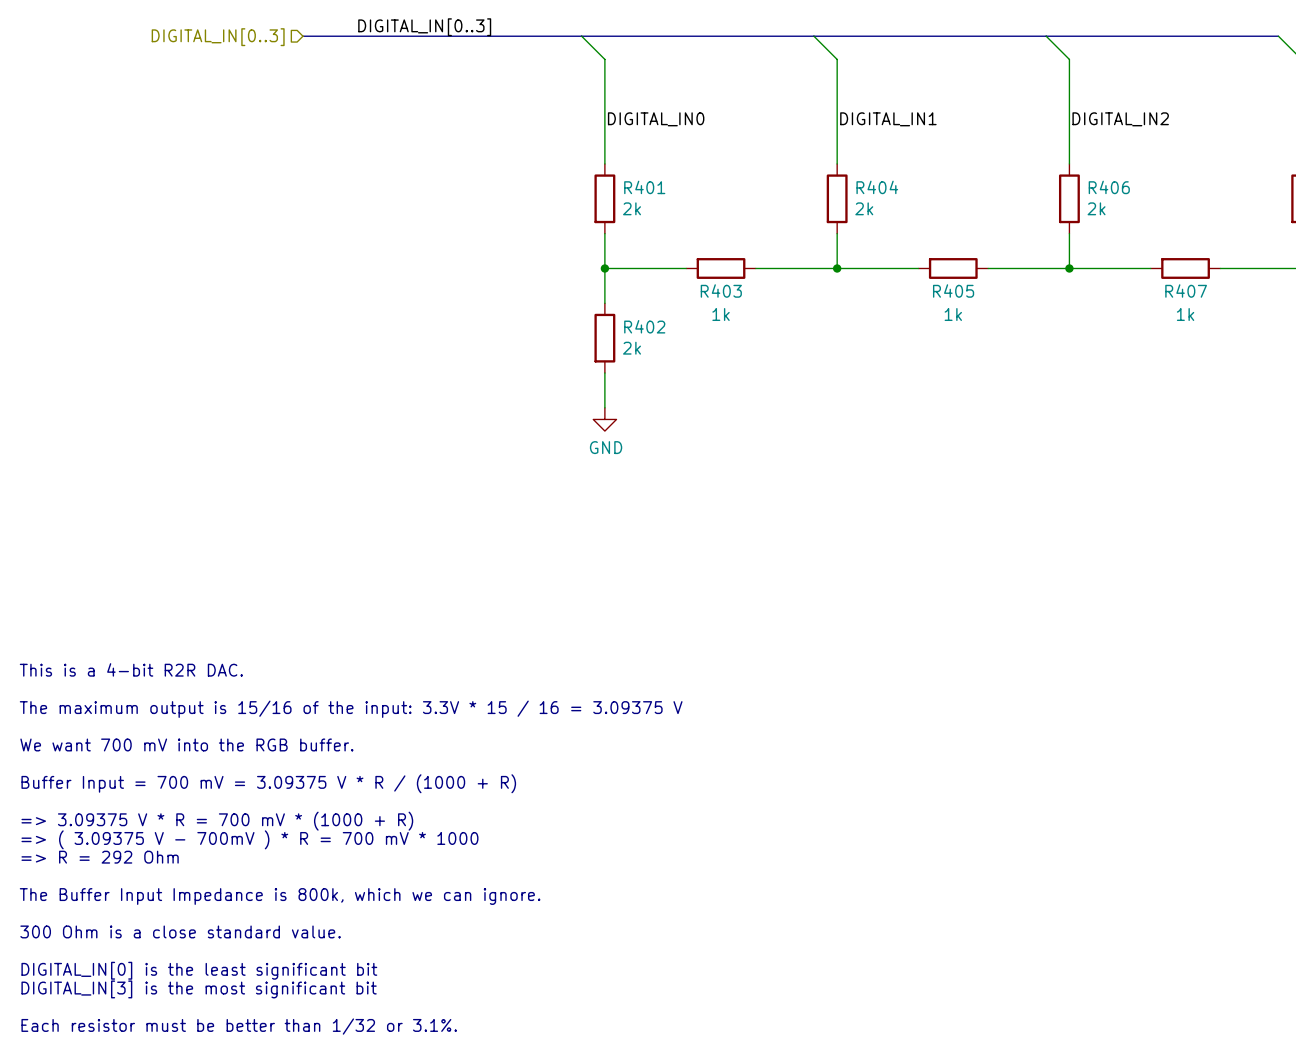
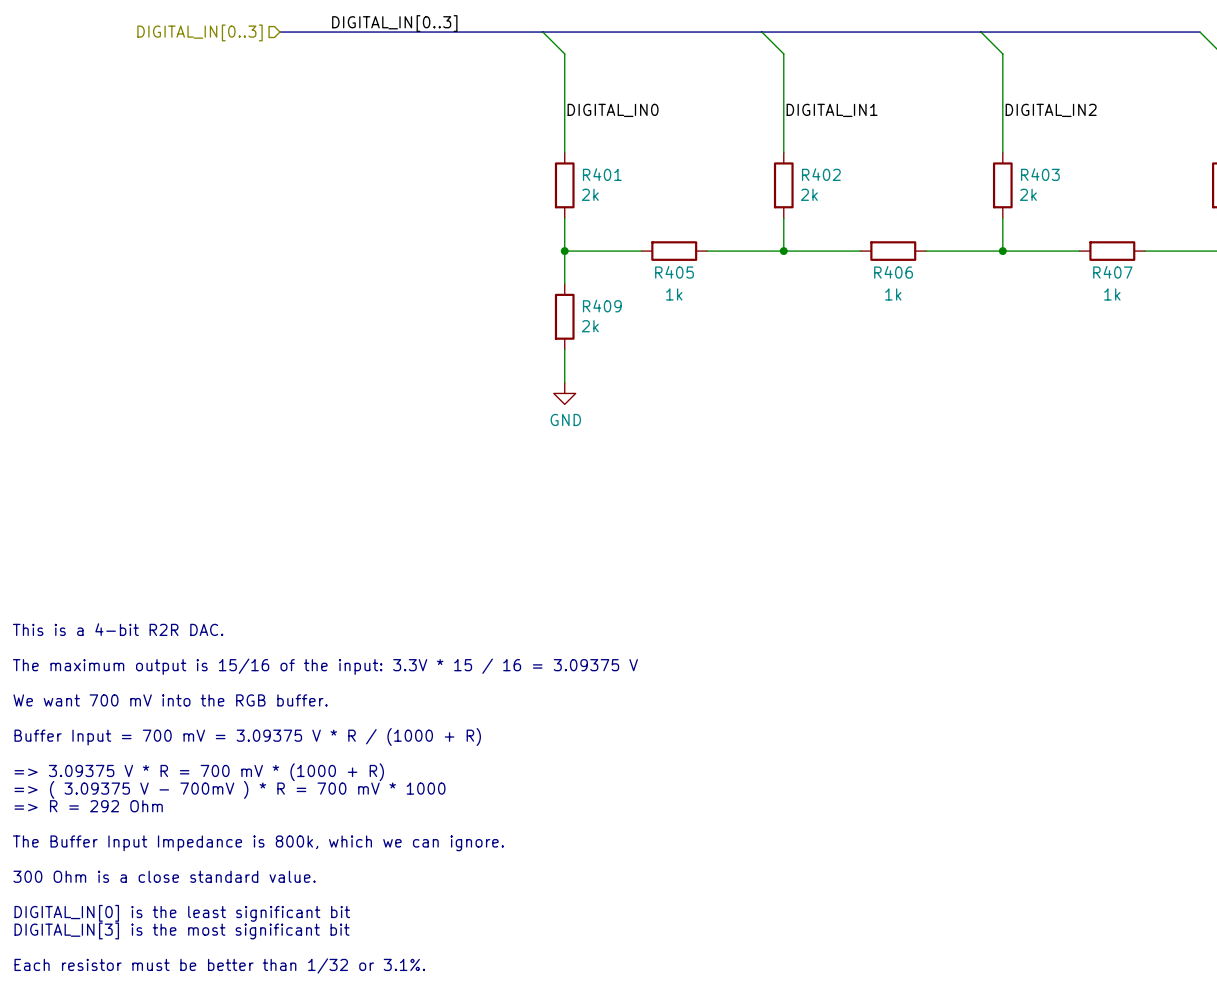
R404 name: R404 (877, 187) -> R402 (821, 174)
R406 name: R406 (1109, 187) -> R403 (1040, 174)
R403 name: R403 (721, 291) -> R405 (674, 272)
R405 name: R405 (953, 291) -> R406 (893, 272)
R402 name: R402 (644, 326) -> R409 (602, 306)

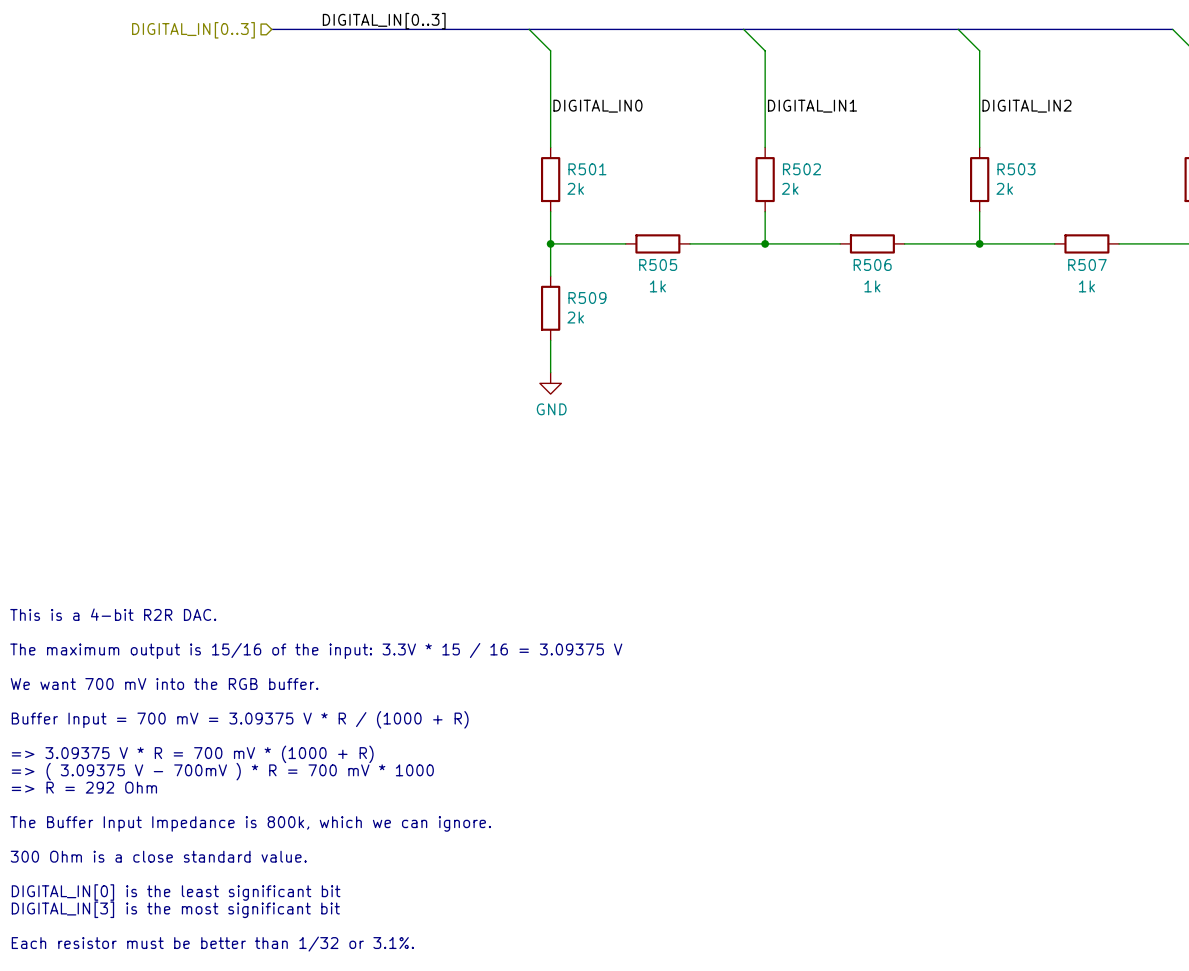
R401 name: R401 (602, 174) -> R501 (587, 169)
R402 name: R402 (821, 174) -> R502 (801, 169)
R403 name: R403 (1040, 174) -> R503 (1016, 169)
R405 name: R405 (674, 272) -> R505 (658, 264)
R406 name: R406 (893, 272) -> R506 (872, 264)
R407 name: R407 (1112, 272) -> R507 (1087, 264)
R409 name: R409 (602, 306) -> R509 (587, 298)

